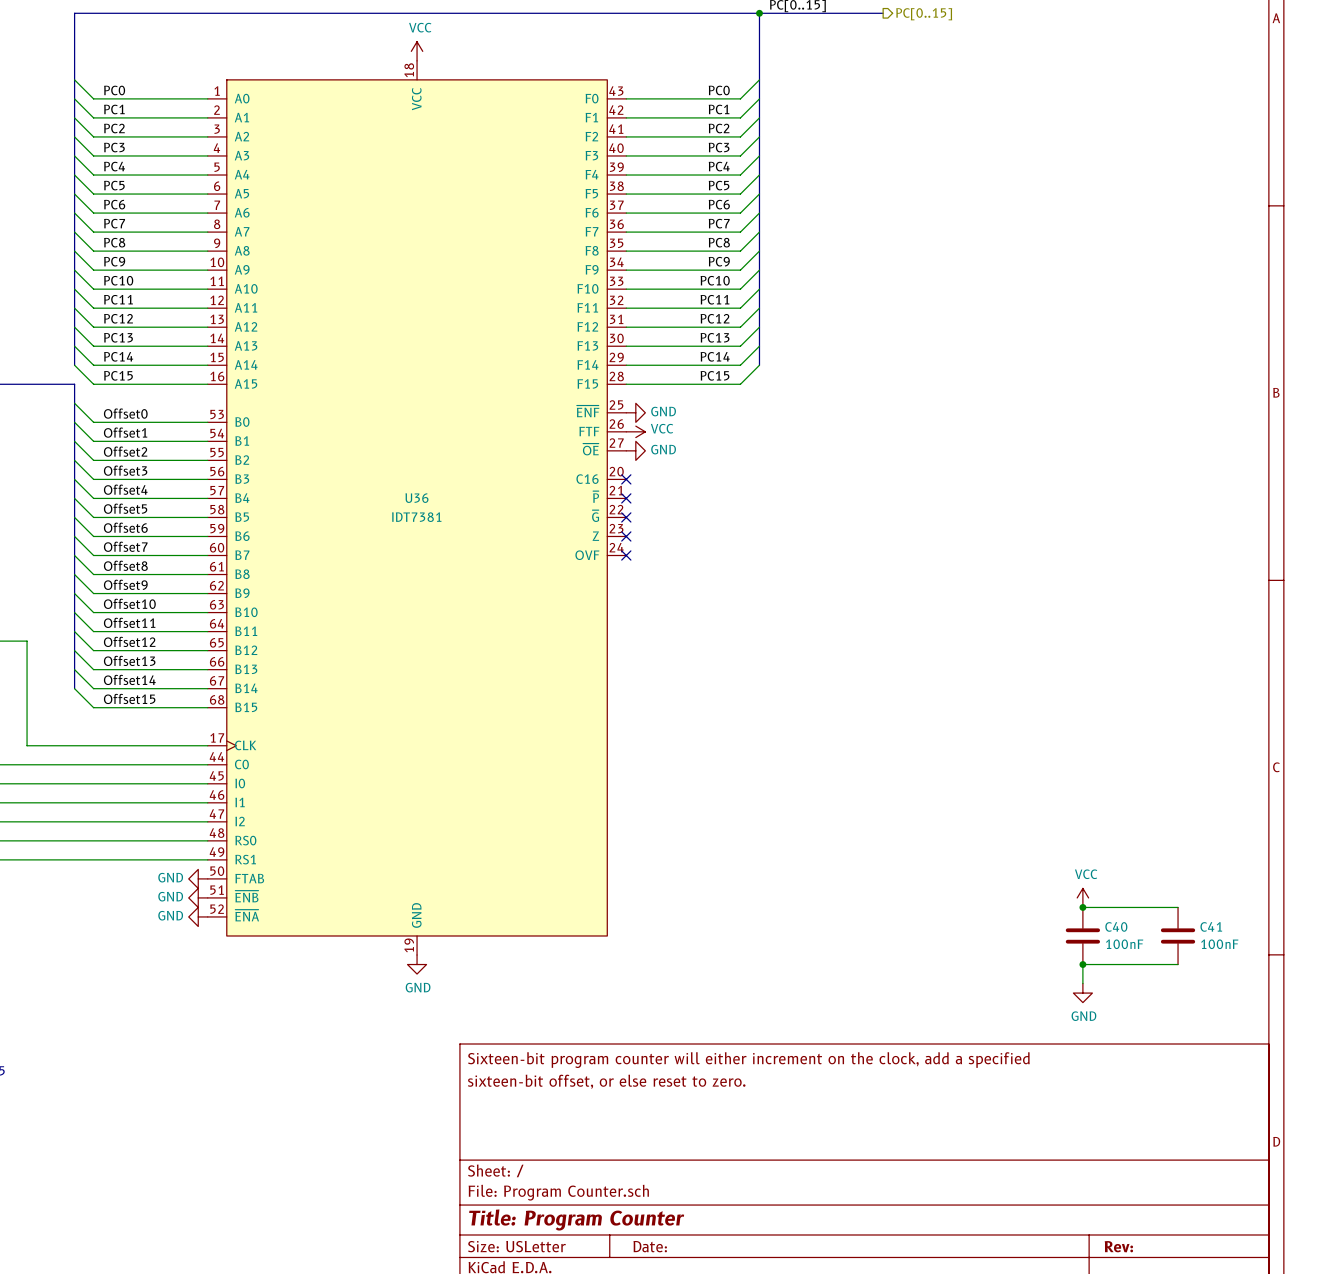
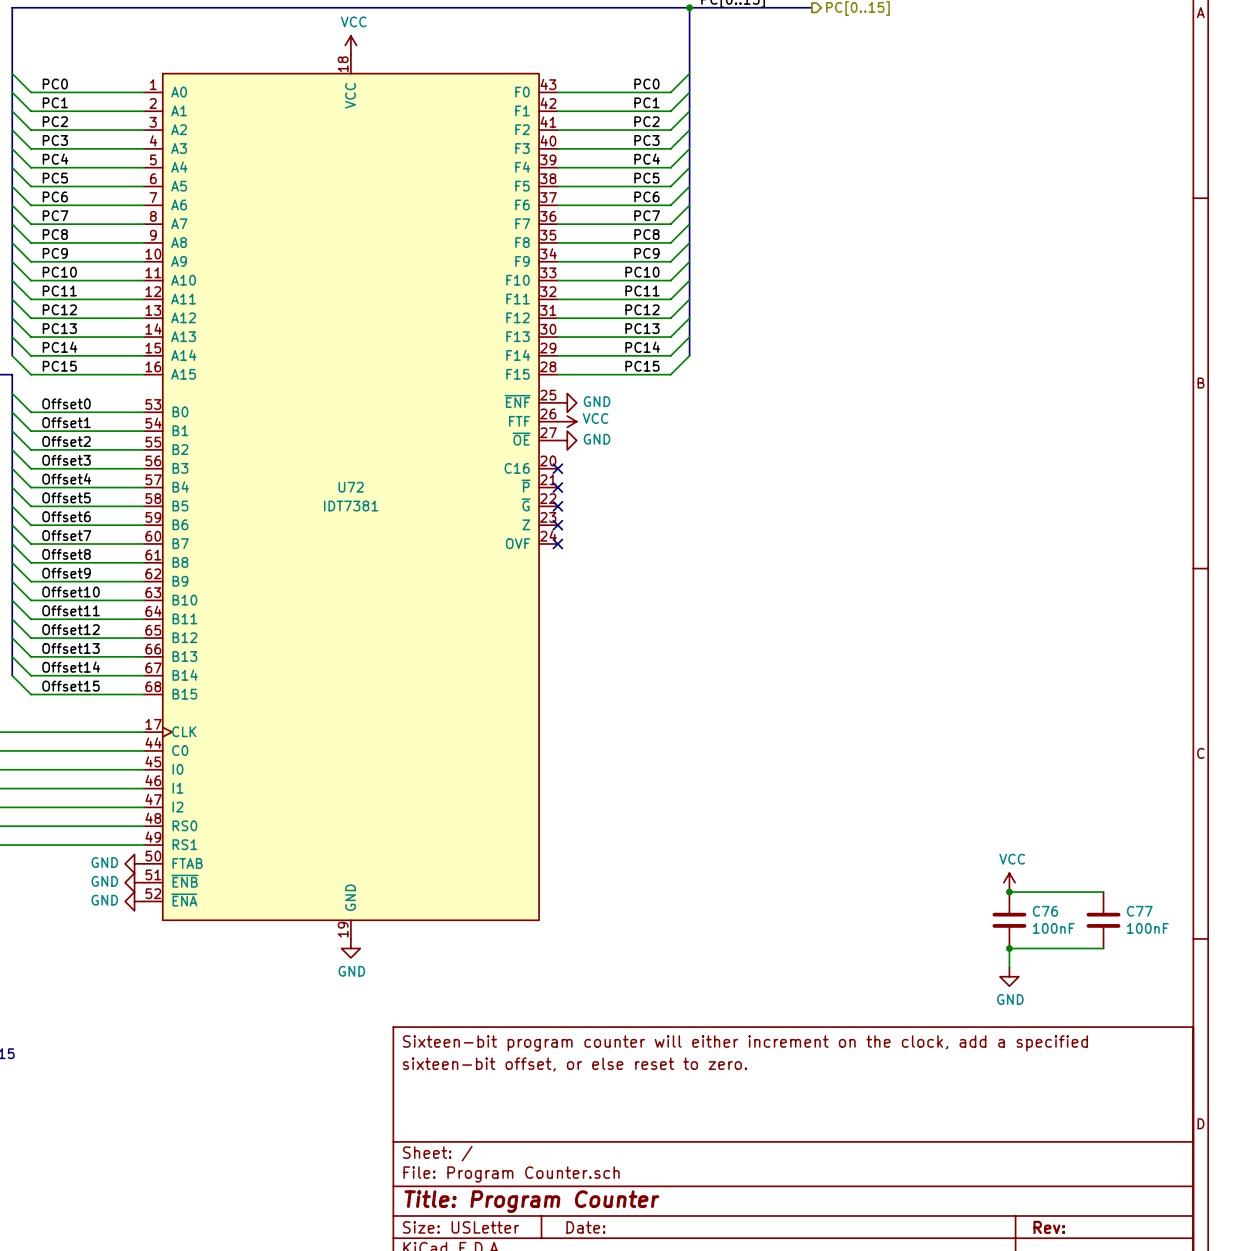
U36 name: U36 (416, 498) -> U72 (351, 487)
C40 name: C40 (1116, 926) -> C76 (1045, 911)
C41 name: C41 (1211, 926) -> C77 (1139, 911)

